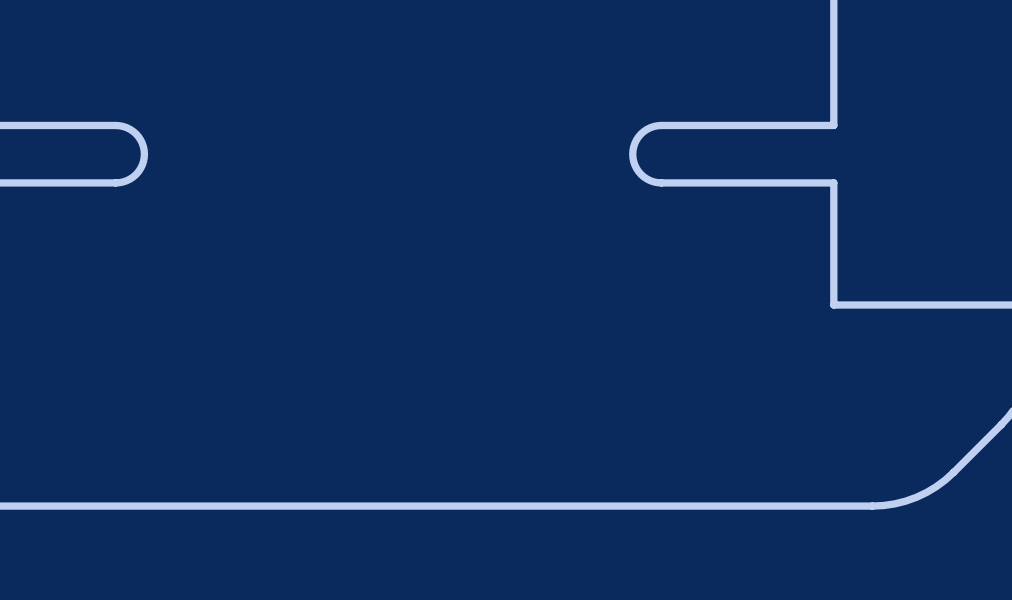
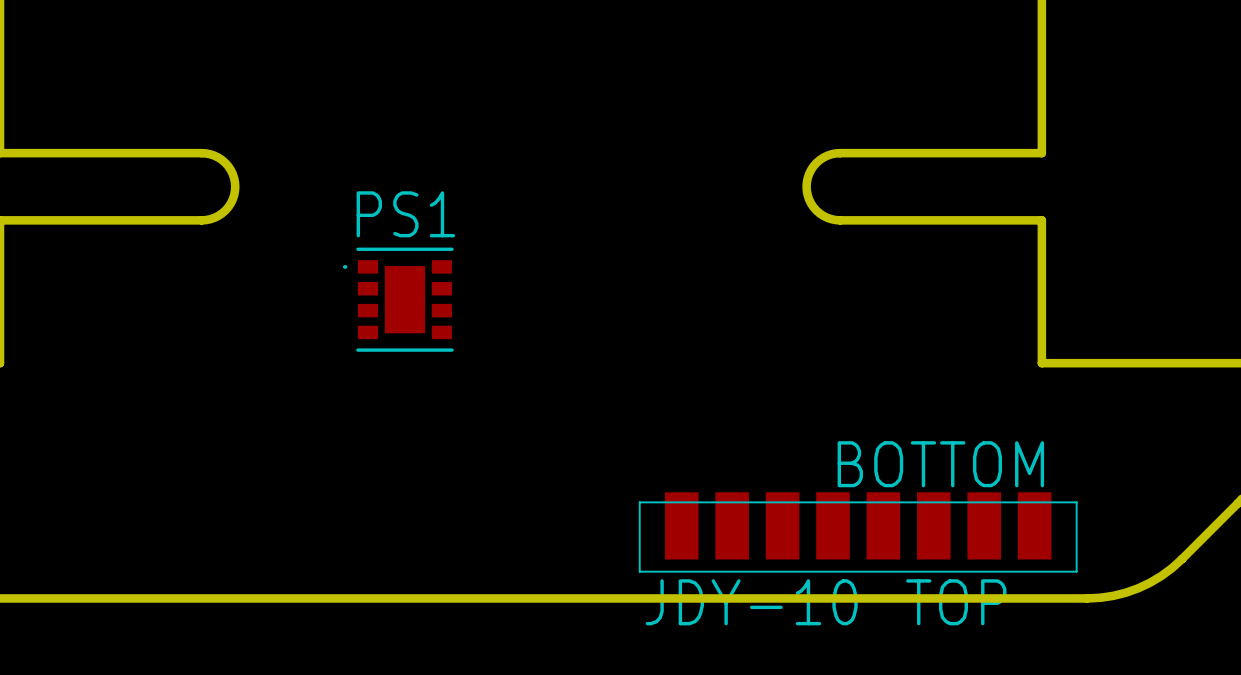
PS1: none -> (398, 299)
part: none -> (858, 532)

